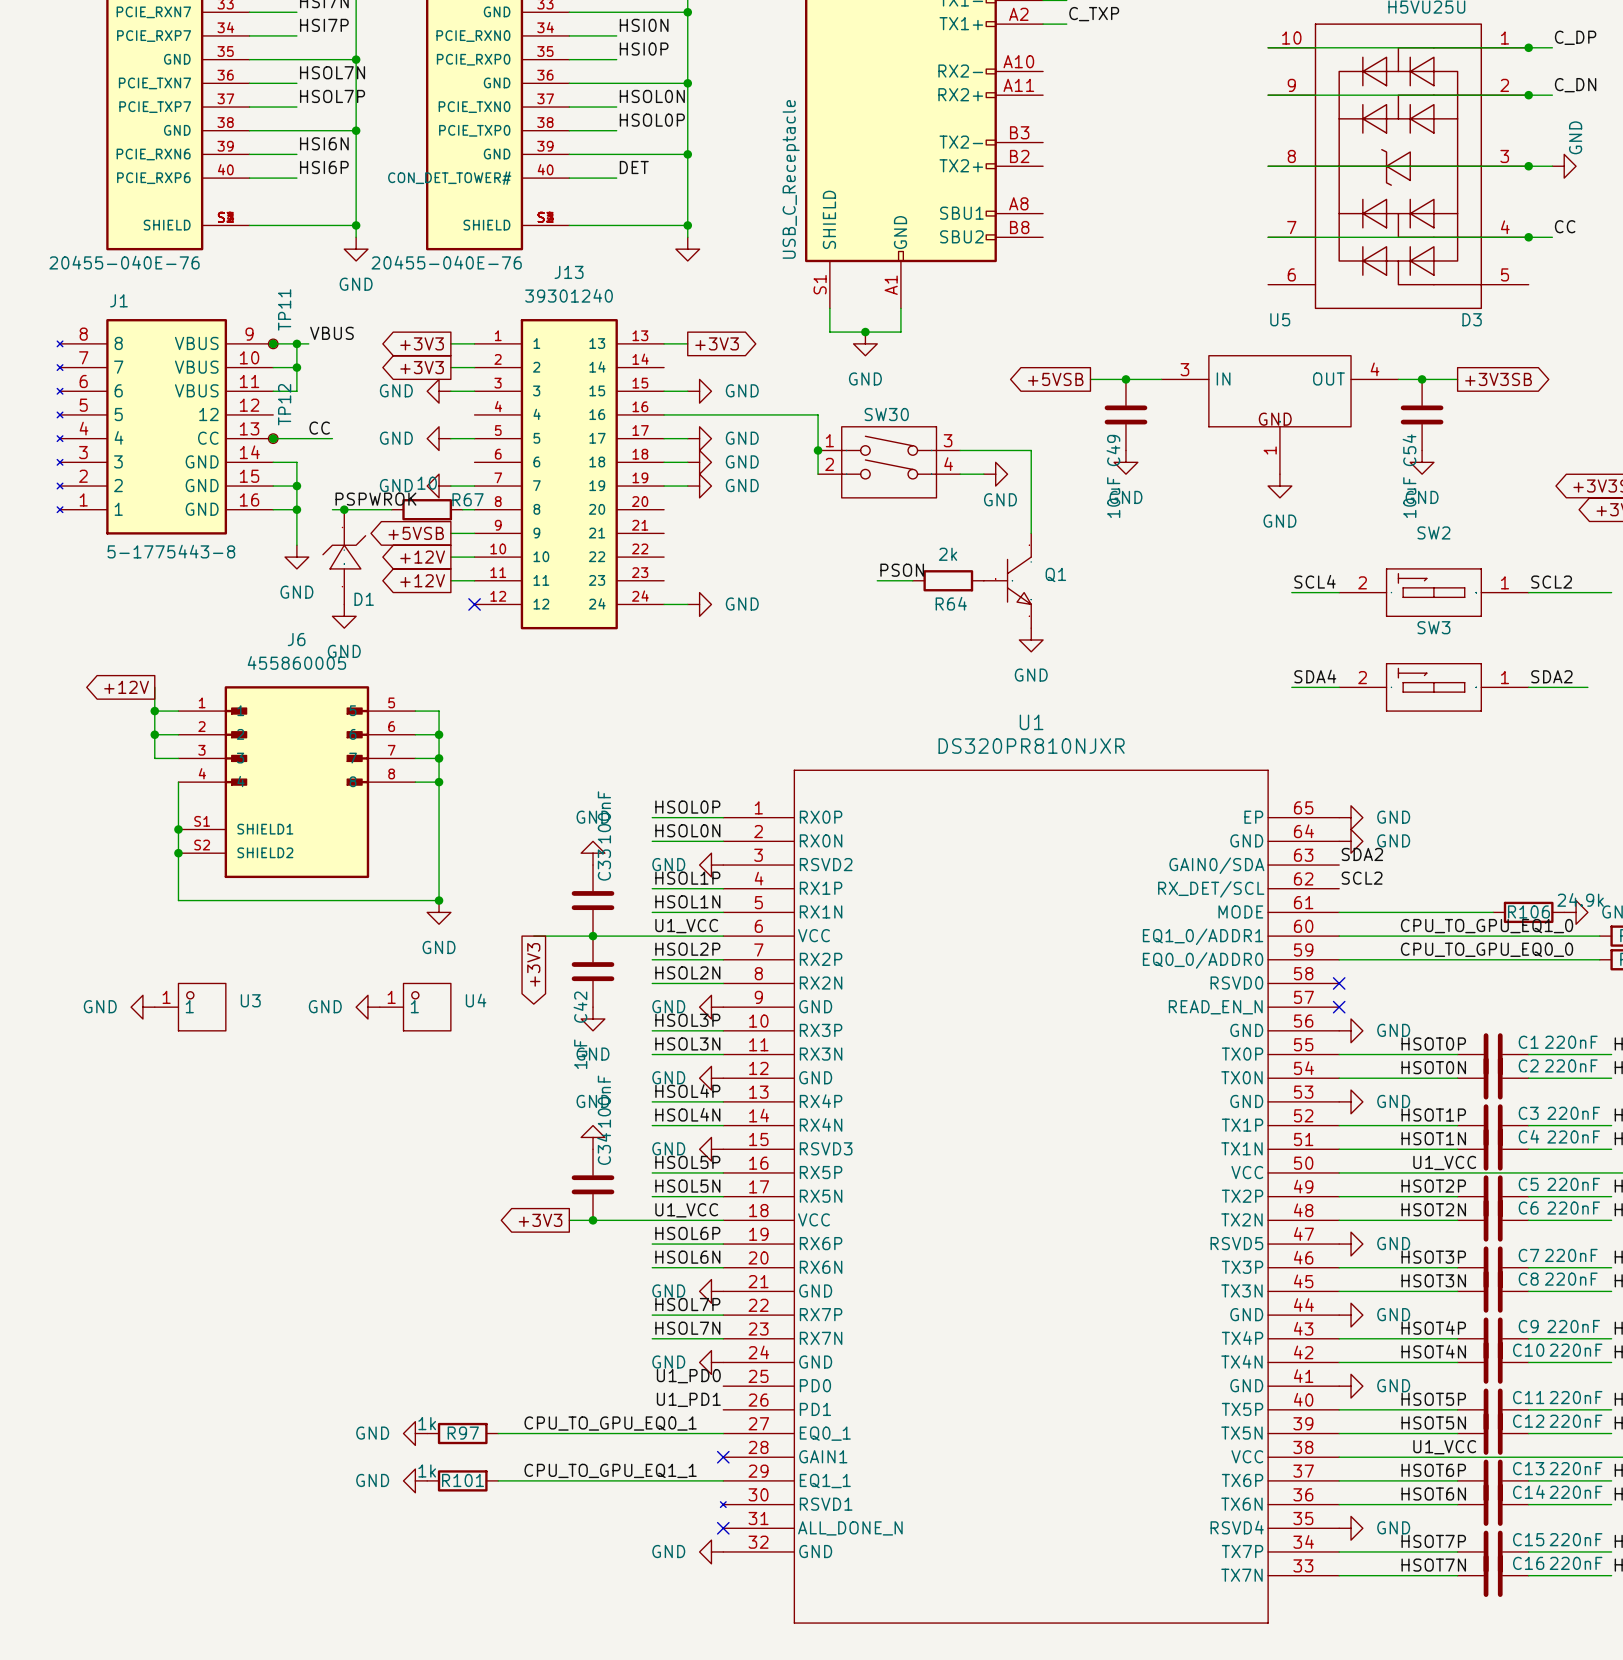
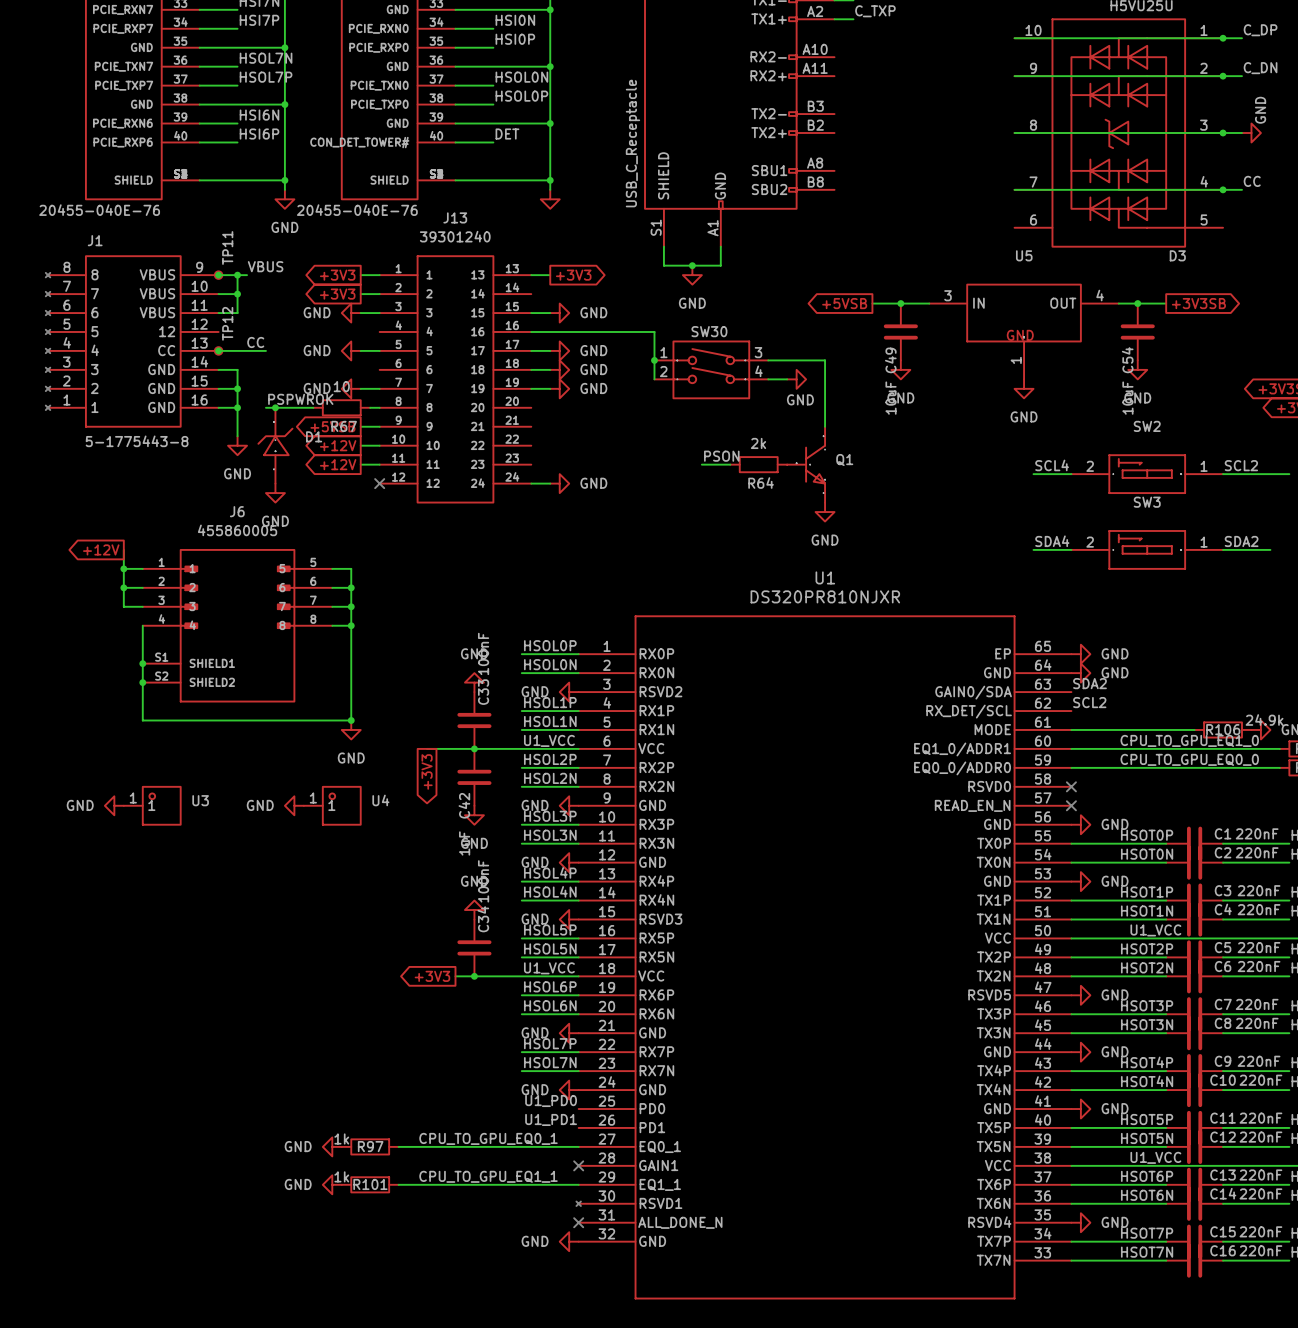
R67 name position: R67 (468, 499) -> R67 (344, 426)
D1 name position: D1 (364, 599) -> D1 (314, 436)

